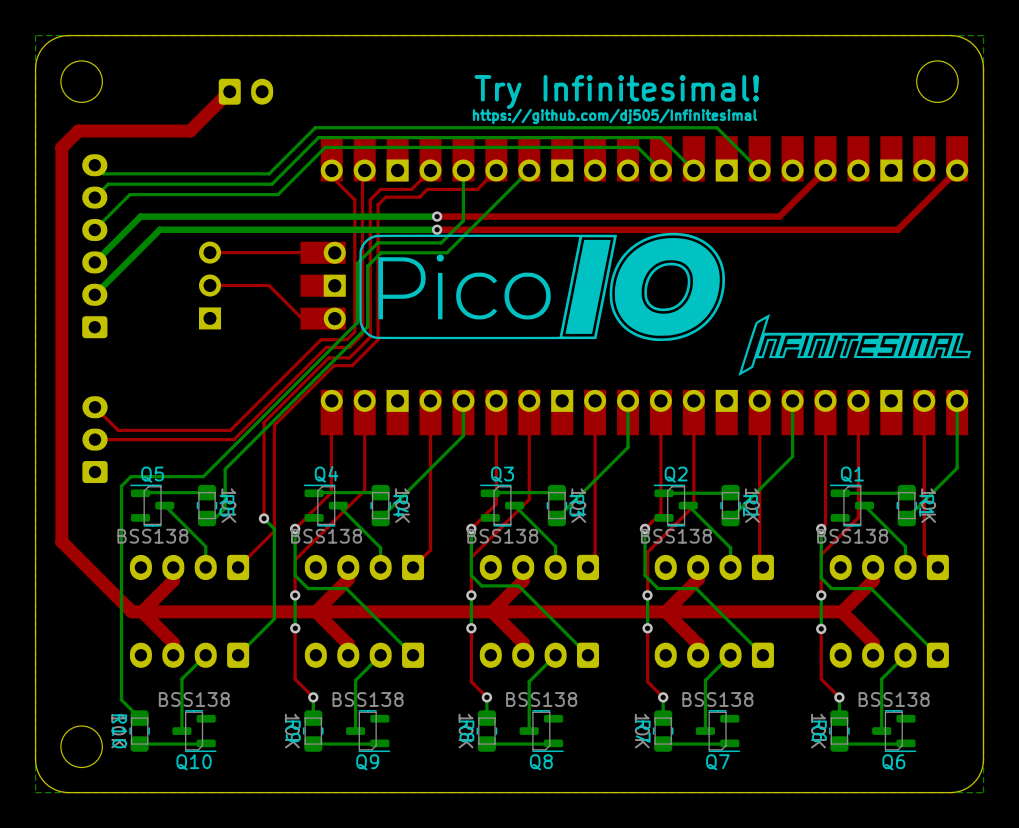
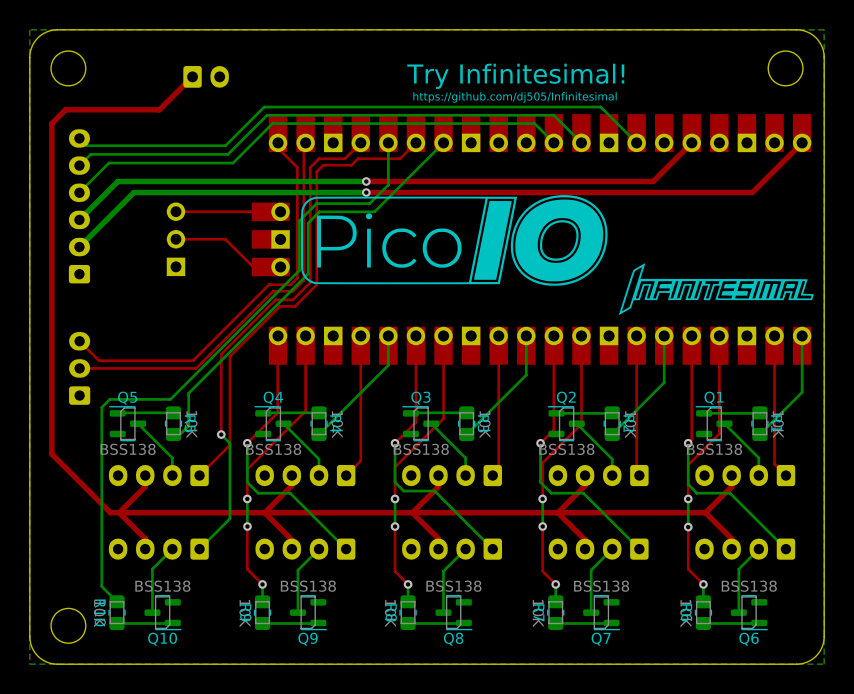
top track width: thick (229, 91) (190, 131) (78, 131) (61, 147) (61, 541) (131, 611) (841, 611) -> thin (192, 76) (159, 109) (65, 109) (51, 123) (51, 454) (110, 512) (705, 512)
top track width: thick (173, 567) (173, 580) (142, 611) (173, 642) (173, 655) -> thin (145, 475) (145, 486) (119, 512) (145, 538) (145, 549)
top track width: thick (348, 567) (348, 579) (315, 611) (348, 644) (348, 655) -> thin (291, 475) (291, 485) (264, 512) (291, 539) (291, 549)
top track width: thick (523, 567) (523, 580) (492, 611) (523, 642) (523, 655) -> thin (438, 475) (438, 486) (412, 512) (438, 538) (438, 549)
top track width: thick (698, 567) (698, 579) (665, 611) (698, 644) (698, 655) -> thin (585, 475) (585, 485) (557, 512) (585, 539) (585, 549)
top track width: thick (873, 567) (873, 580) (841, 611) -> thin (731, 475) (731, 486) (705, 512)
top track width: thick (841, 611) (873, 642) (873, 655) -> thin (705, 512) (731, 538) (731, 549)

